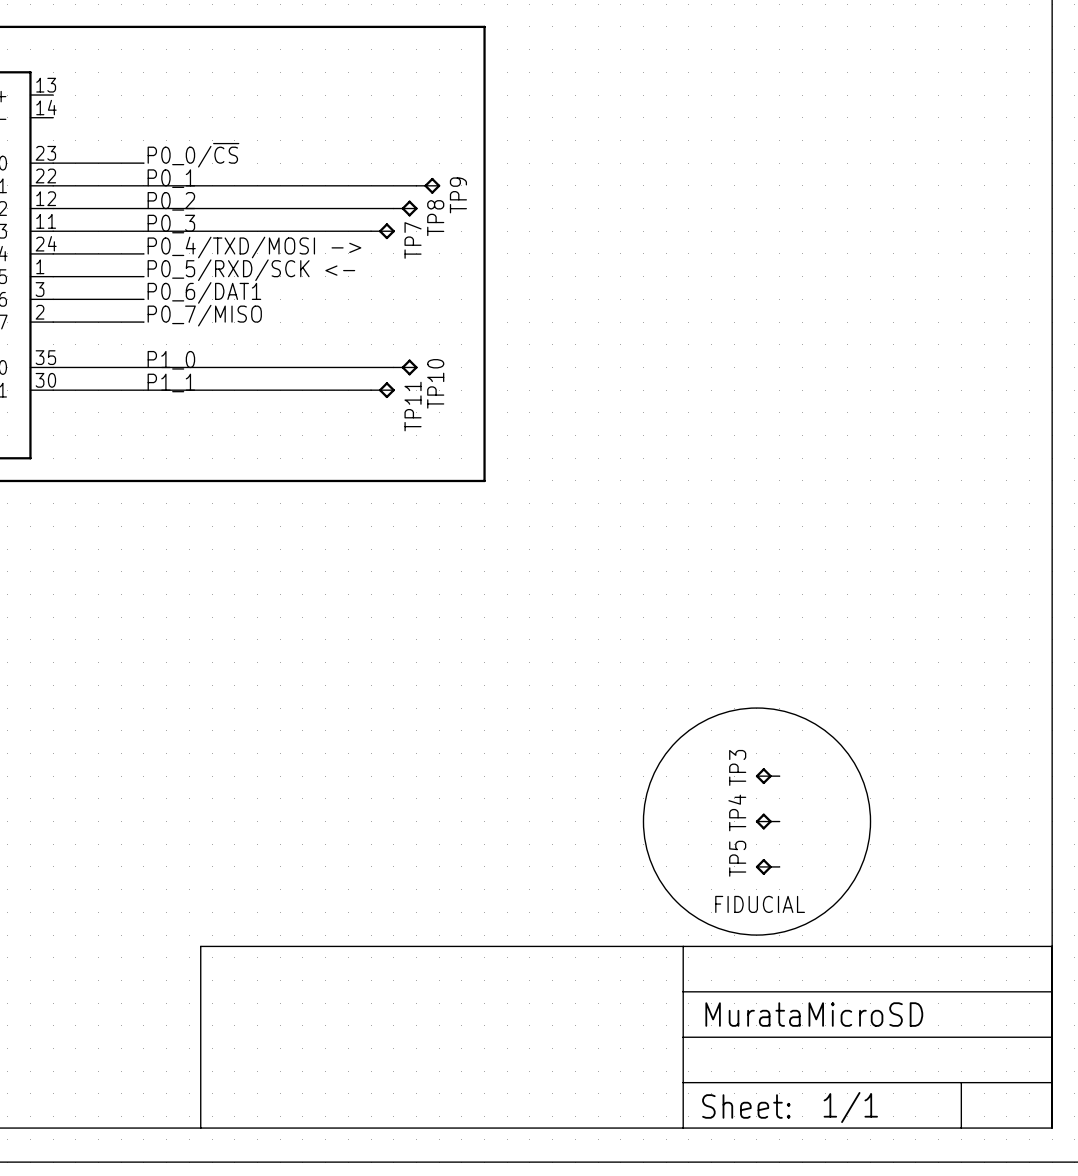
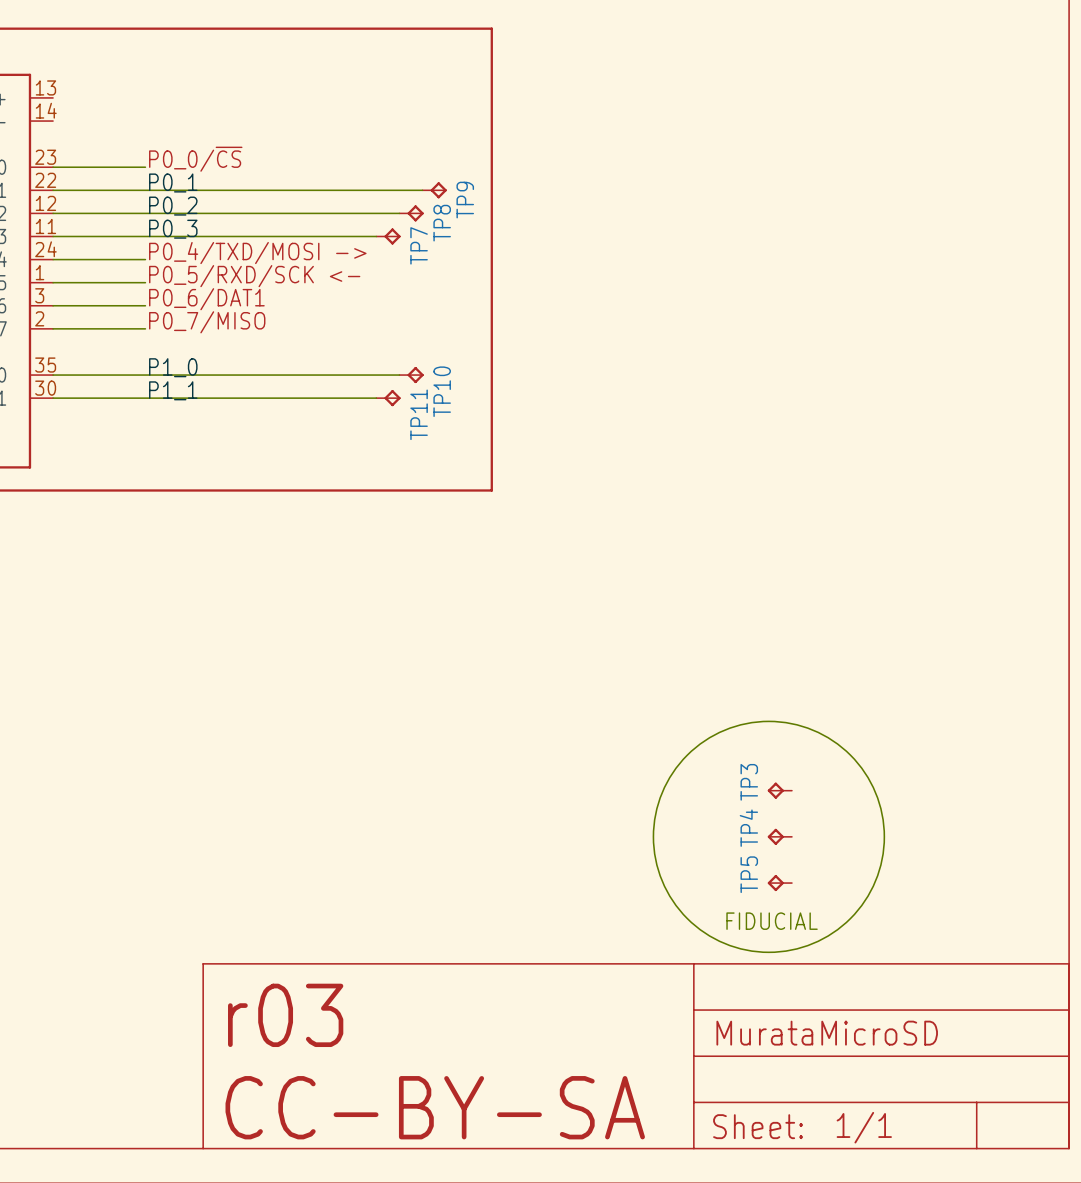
text: none -> r03 (285, 1015)
text: none -> CC-BY-SA (435, 1107)

